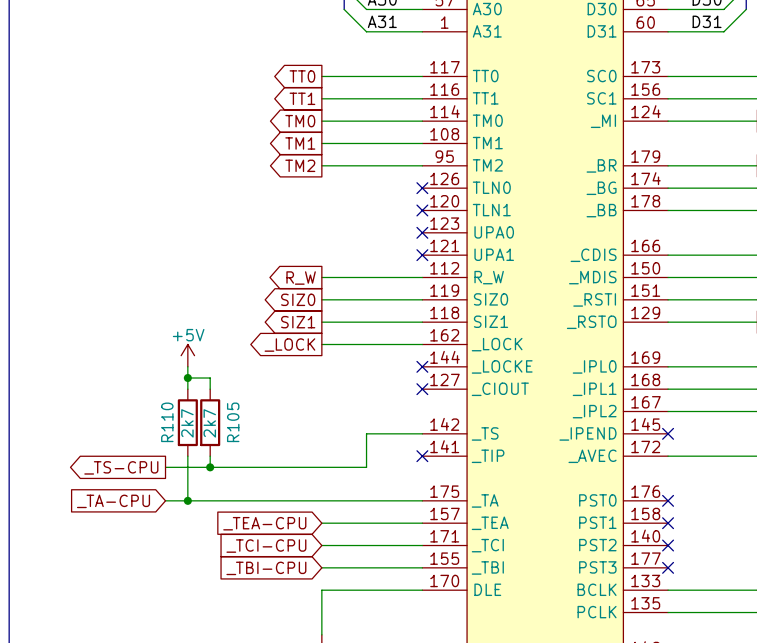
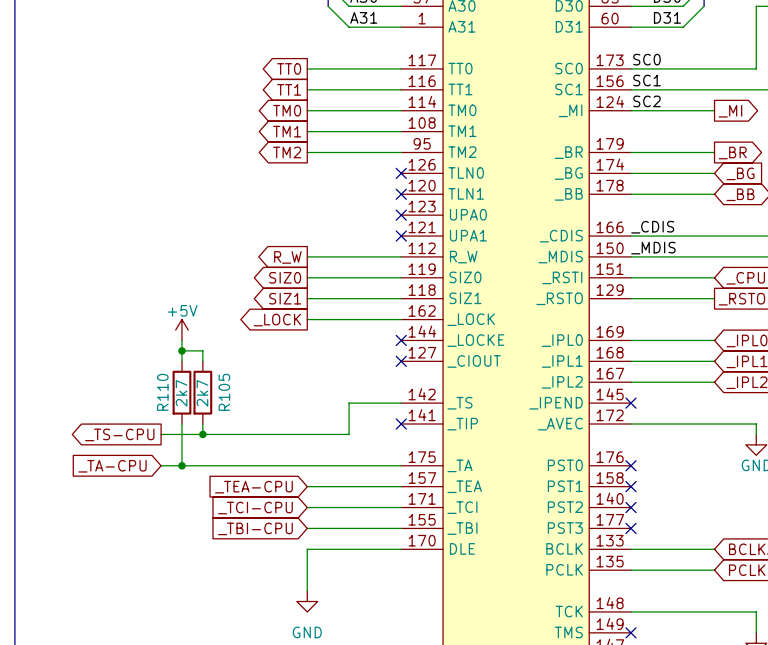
label: none -> SC0 (646, 59)
label: none -> SC1 (646, 80)
label: none -> SC2 (646, 101)
label: none -> _CDIS (652, 227)
label: none -> _MDIS (653, 248)

